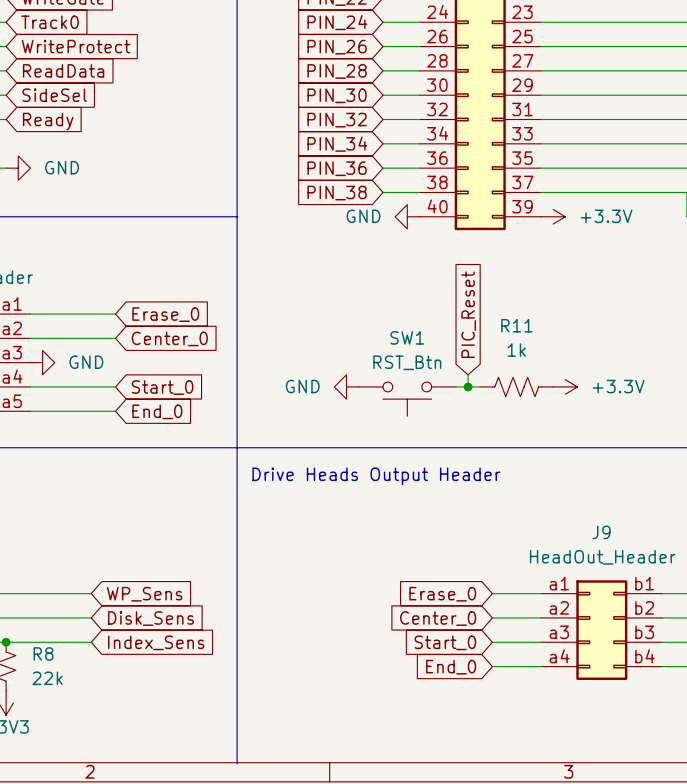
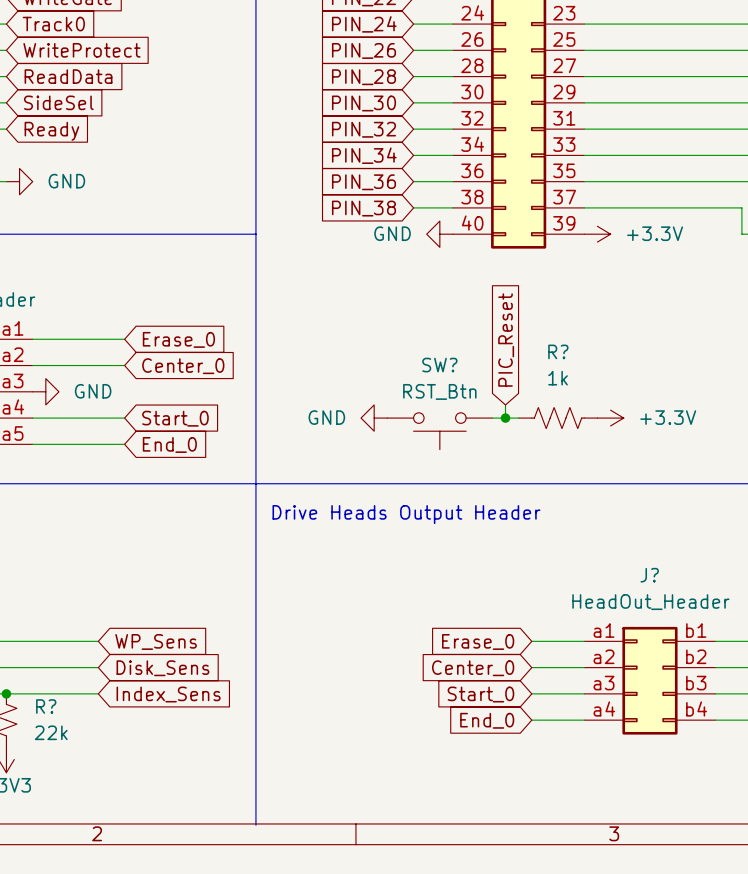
R11 name: R11 (517, 325) -> R? (558, 351)
SW1 name: SW1 (407, 337) -> SW? (439, 365)
J9 name: J9 (601, 532) -> J? (649, 575)
R8 name: R8 (43, 653) -> R? (46, 706)

